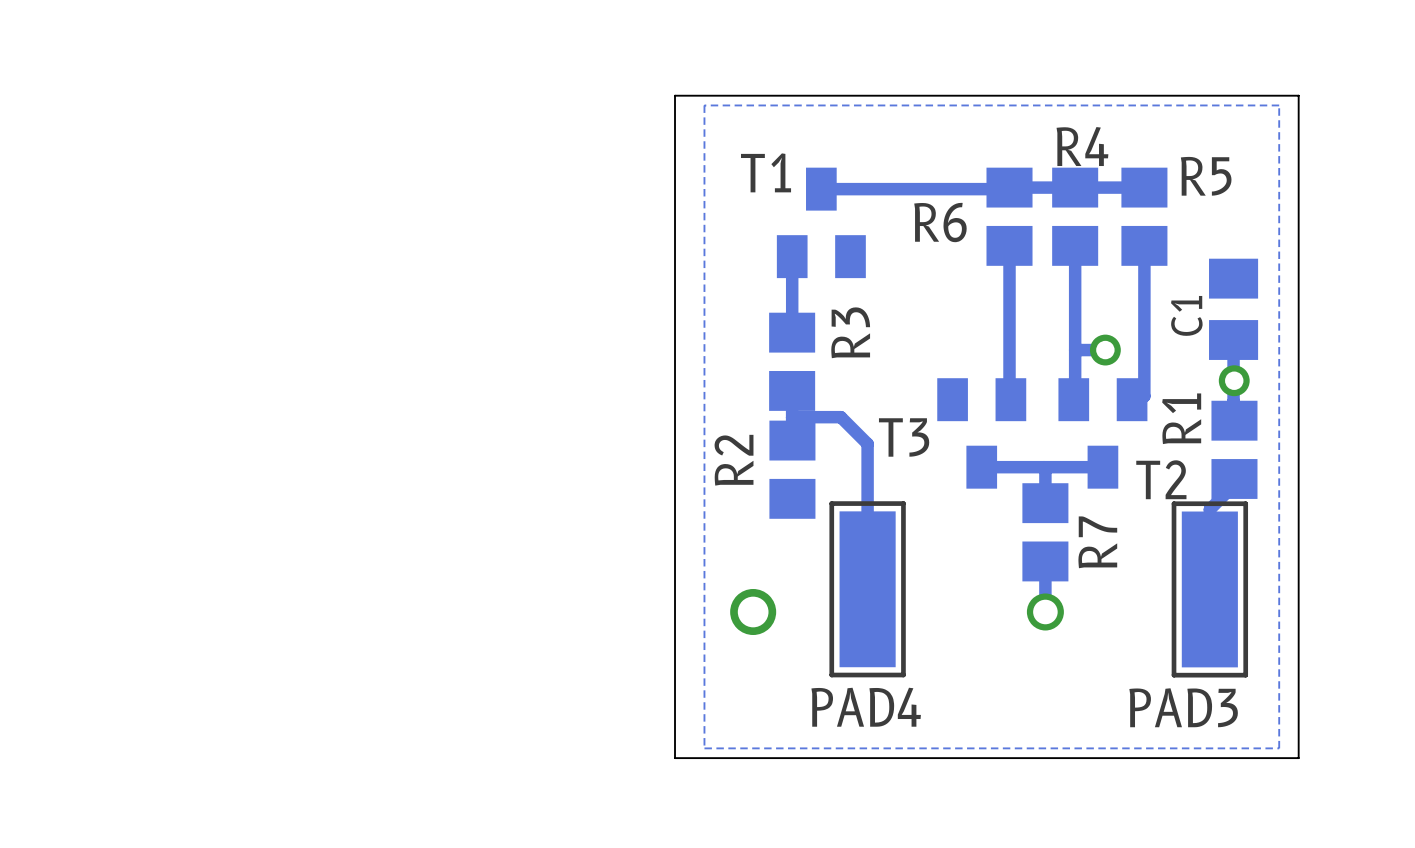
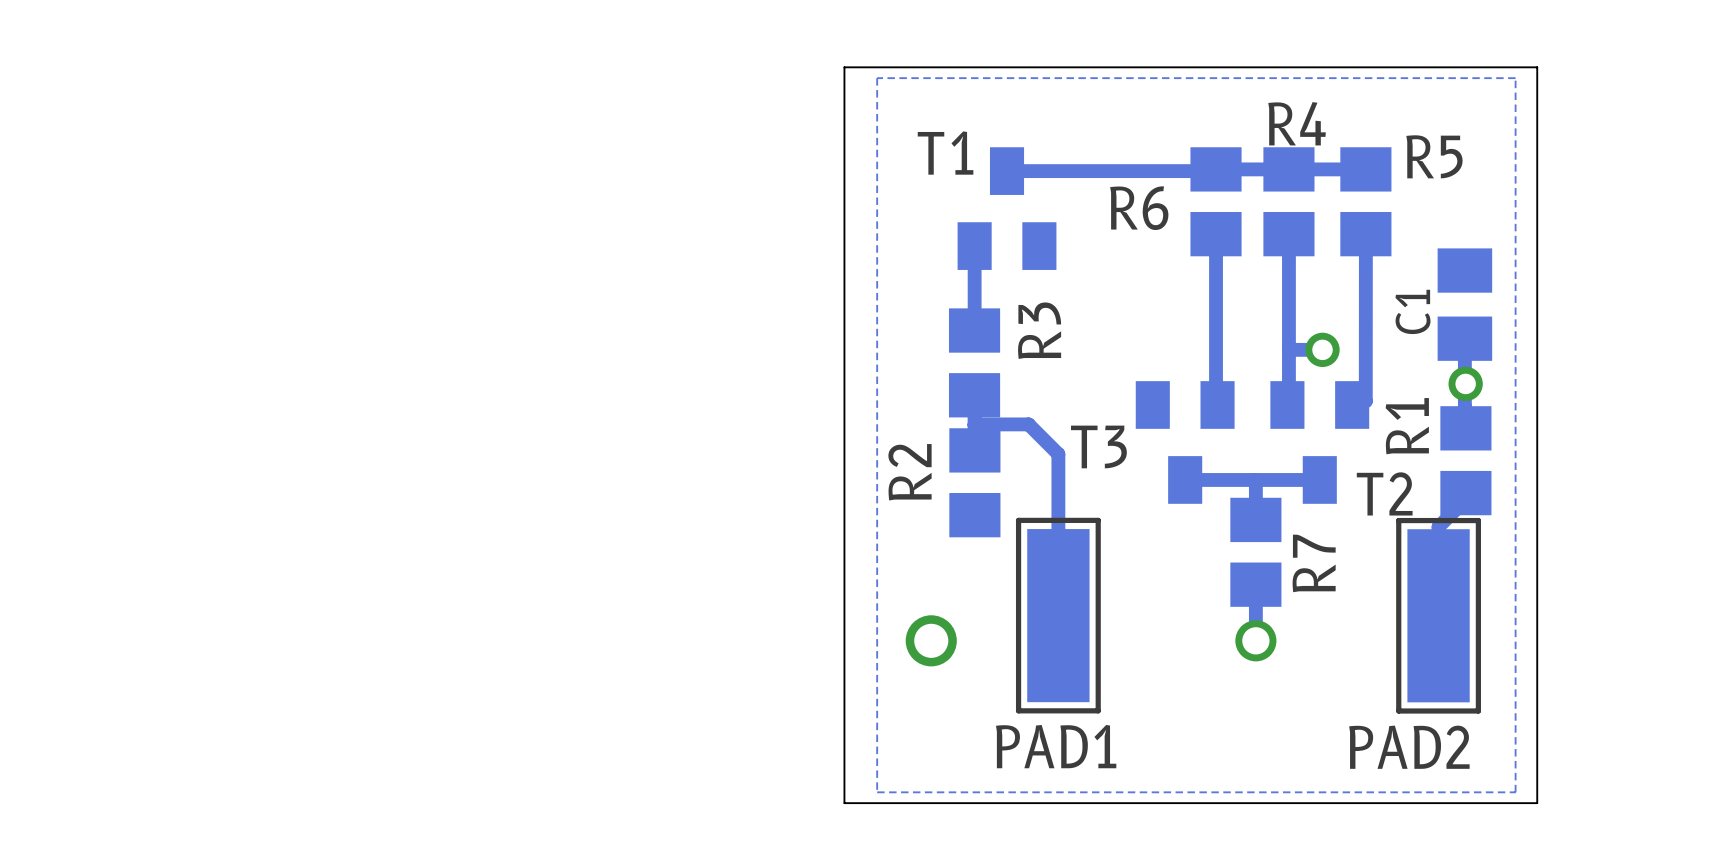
PAD4 name: PAD4 (866, 707) -> PAD1 (1056, 746)
PAD3 name: PAD3 (1183, 707) -> PAD2 (1409, 747)

